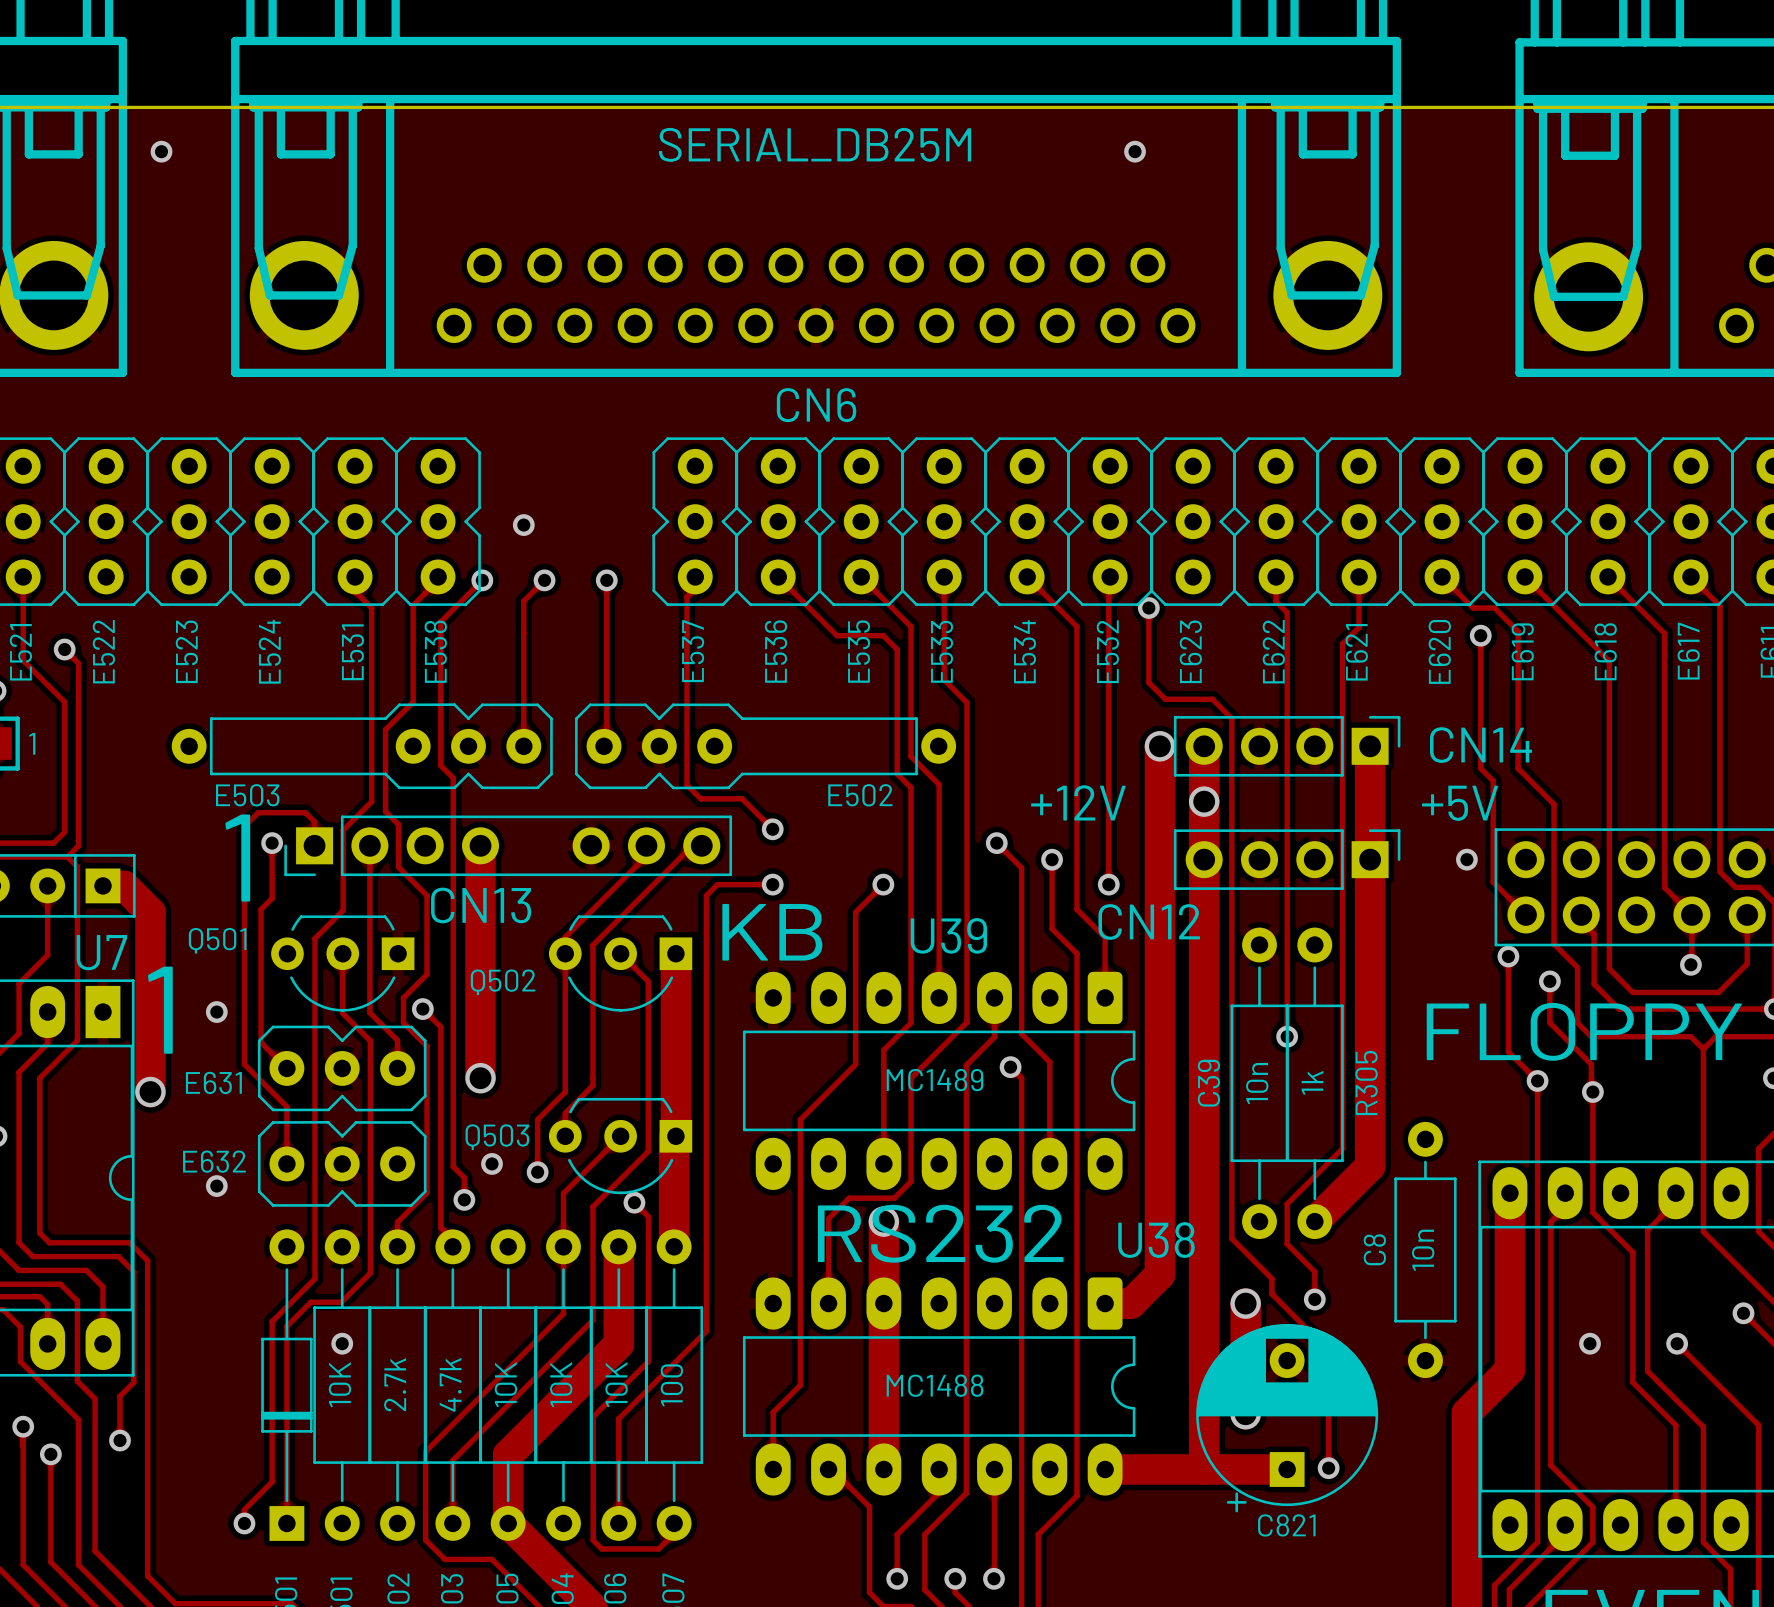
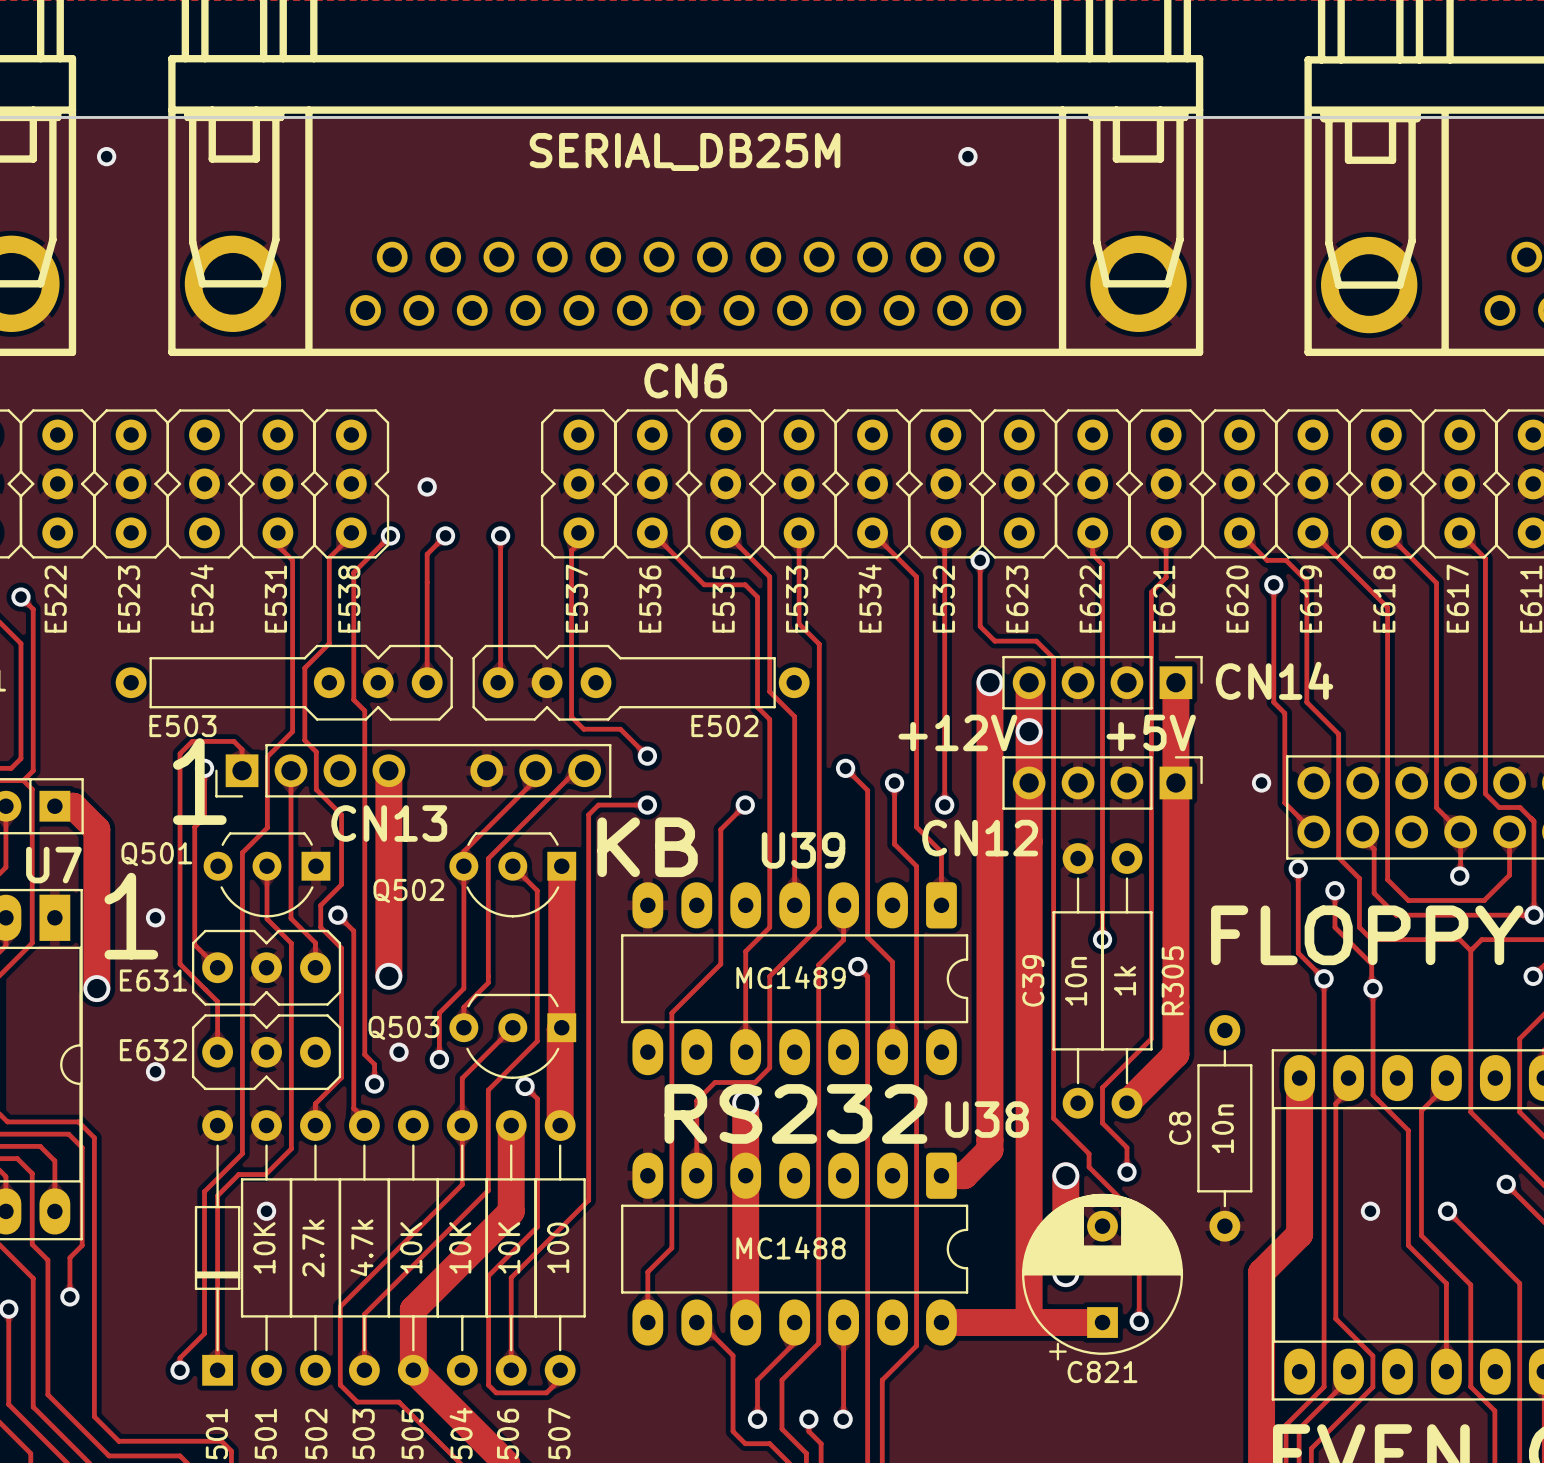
text position: +12V (1078, 802) -> +12V (957, 732)
text position: +5V (1460, 803) -> +5V (1151, 732)

